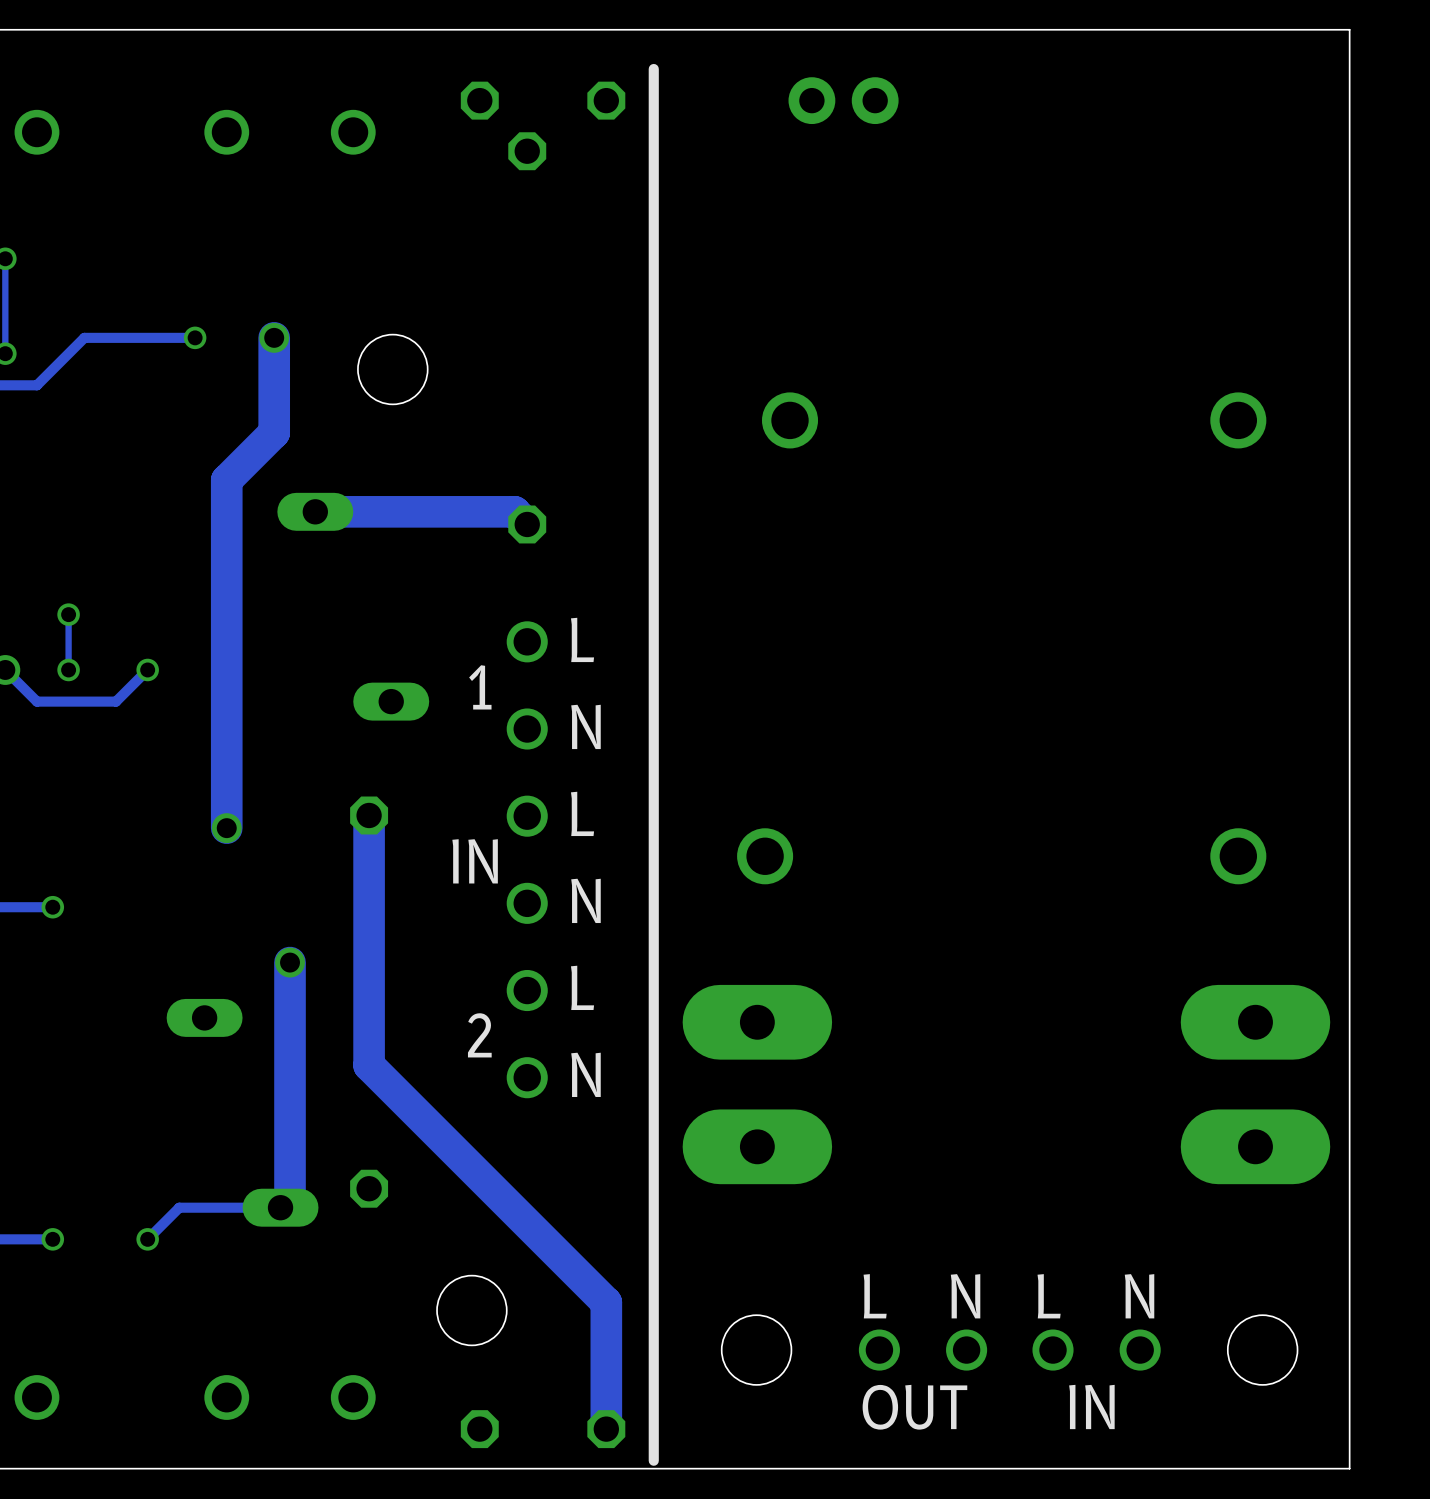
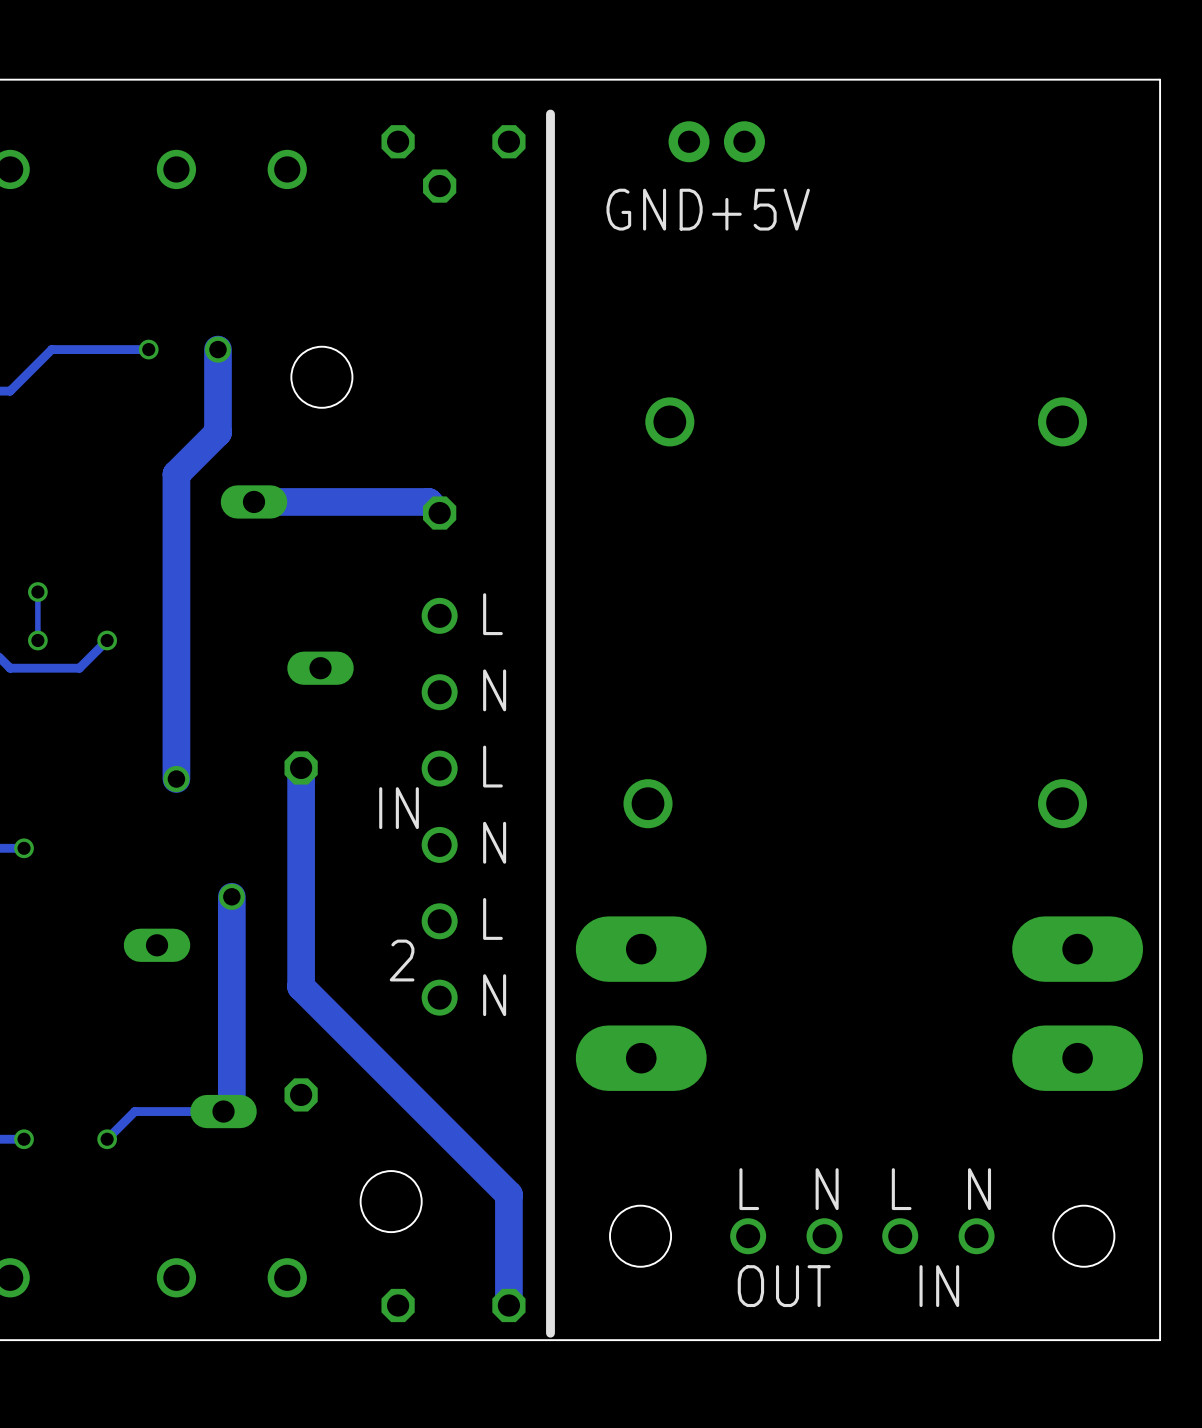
text: none -> GND (654, 209)
text: none -> +5V (760, 209)
text: 1 (480, 687) -> none

